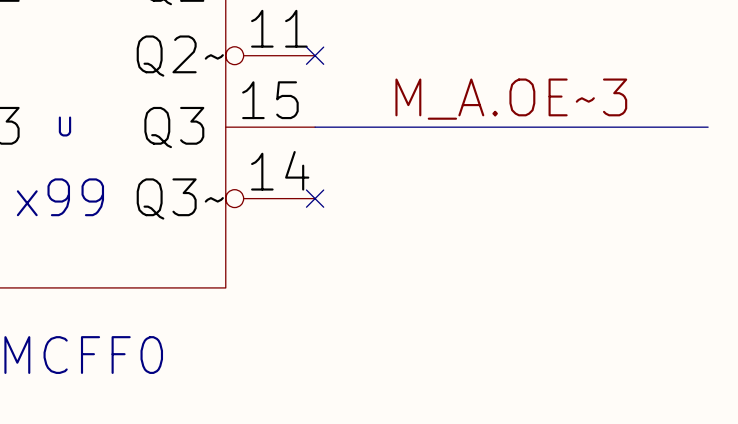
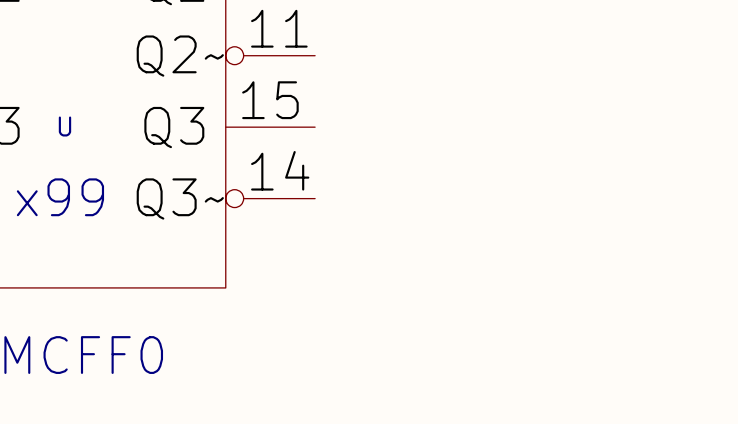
no-connect mark: (315, 55) -> none
label: M_A.OE~3 (511, 99) -> none
wire: (315, 127) (708, 127) -> none
no-connect mark: (315, 198) -> none

